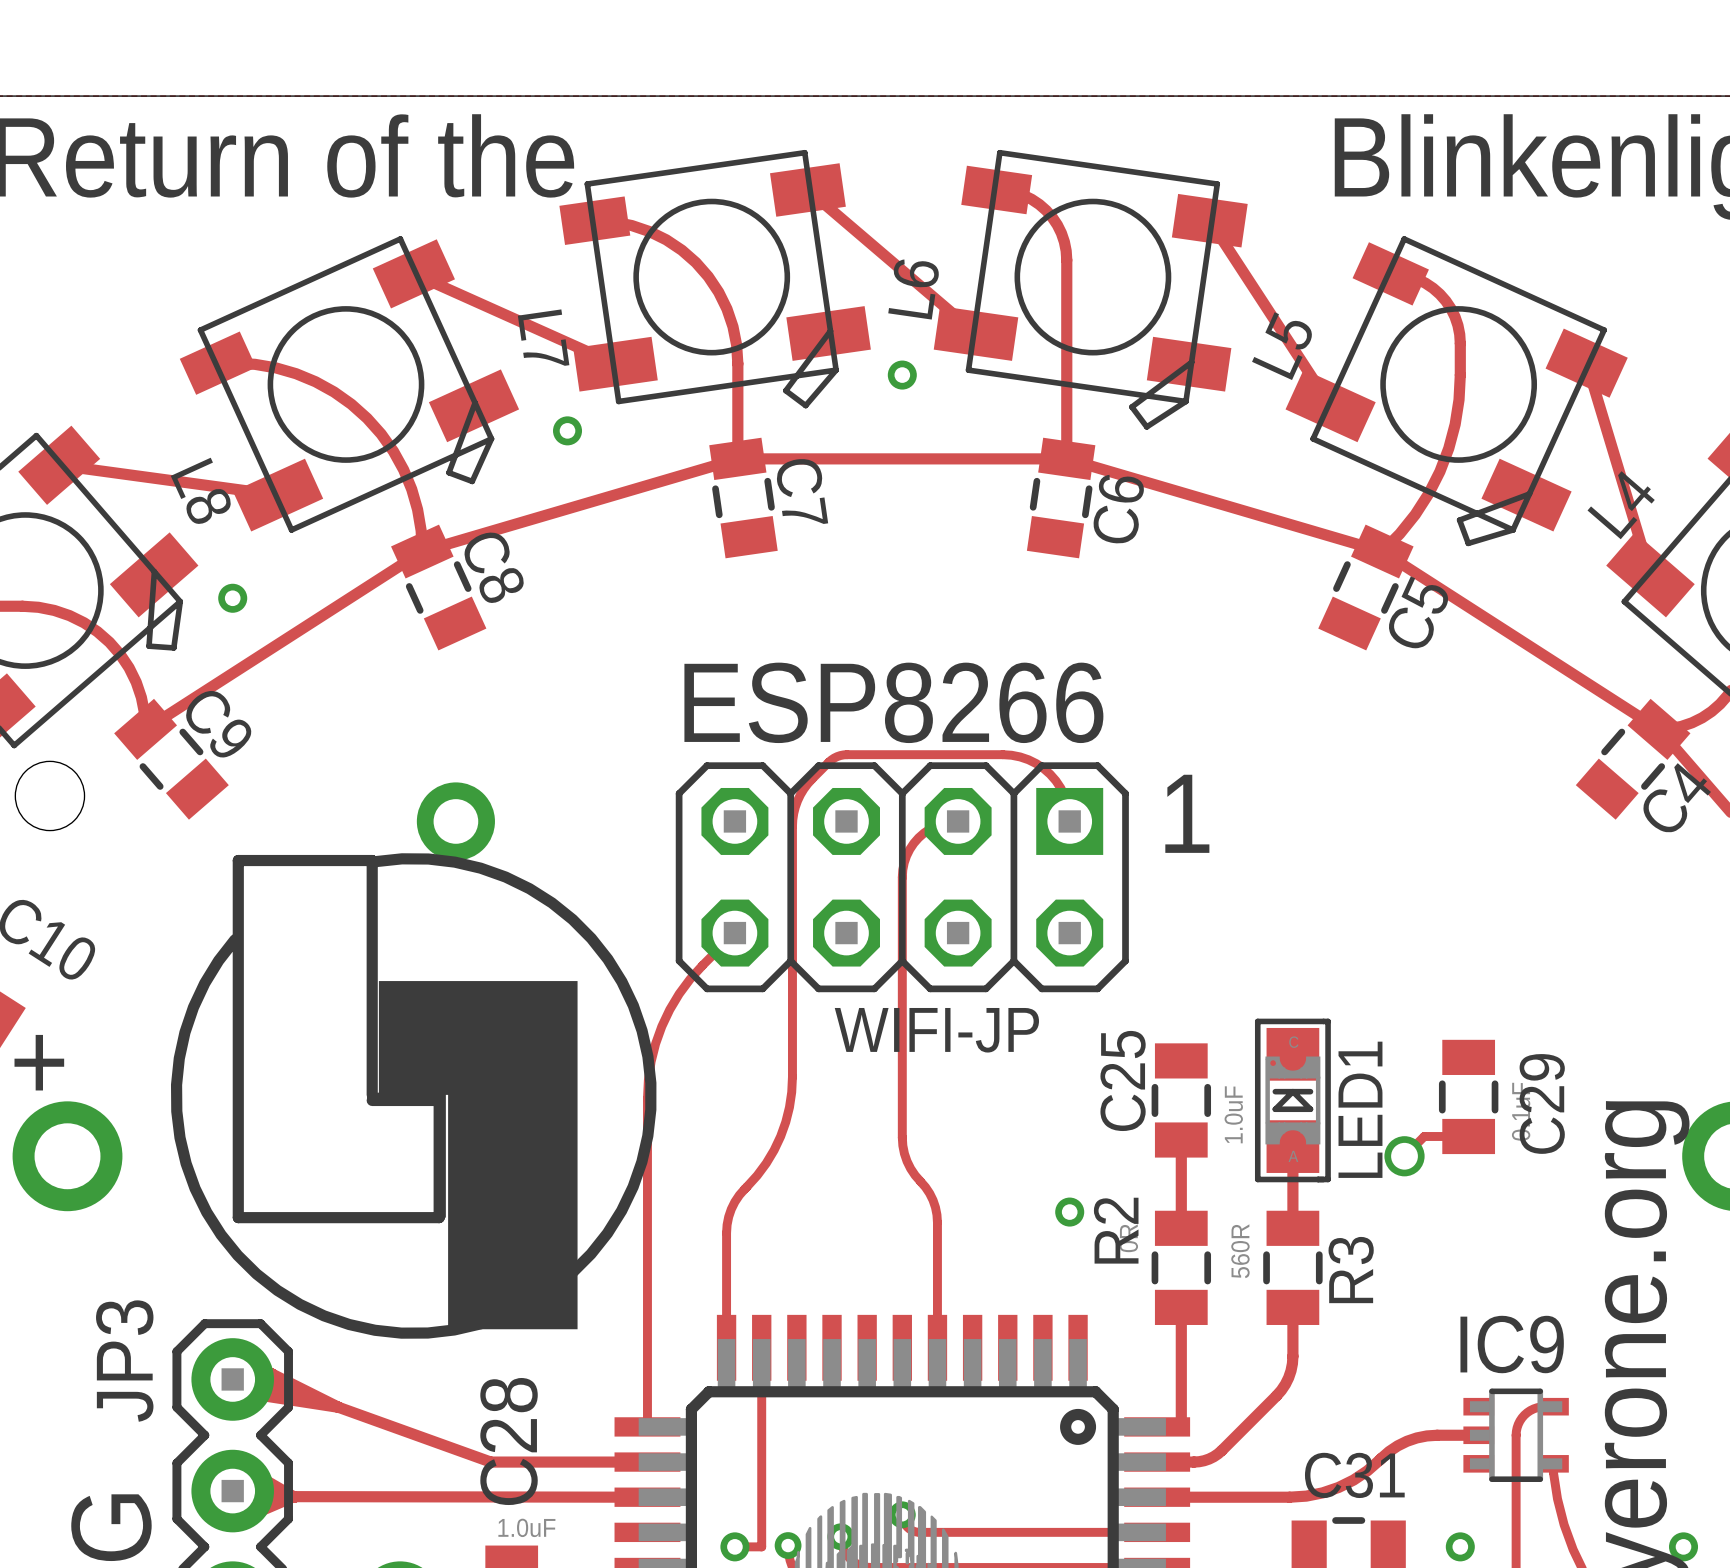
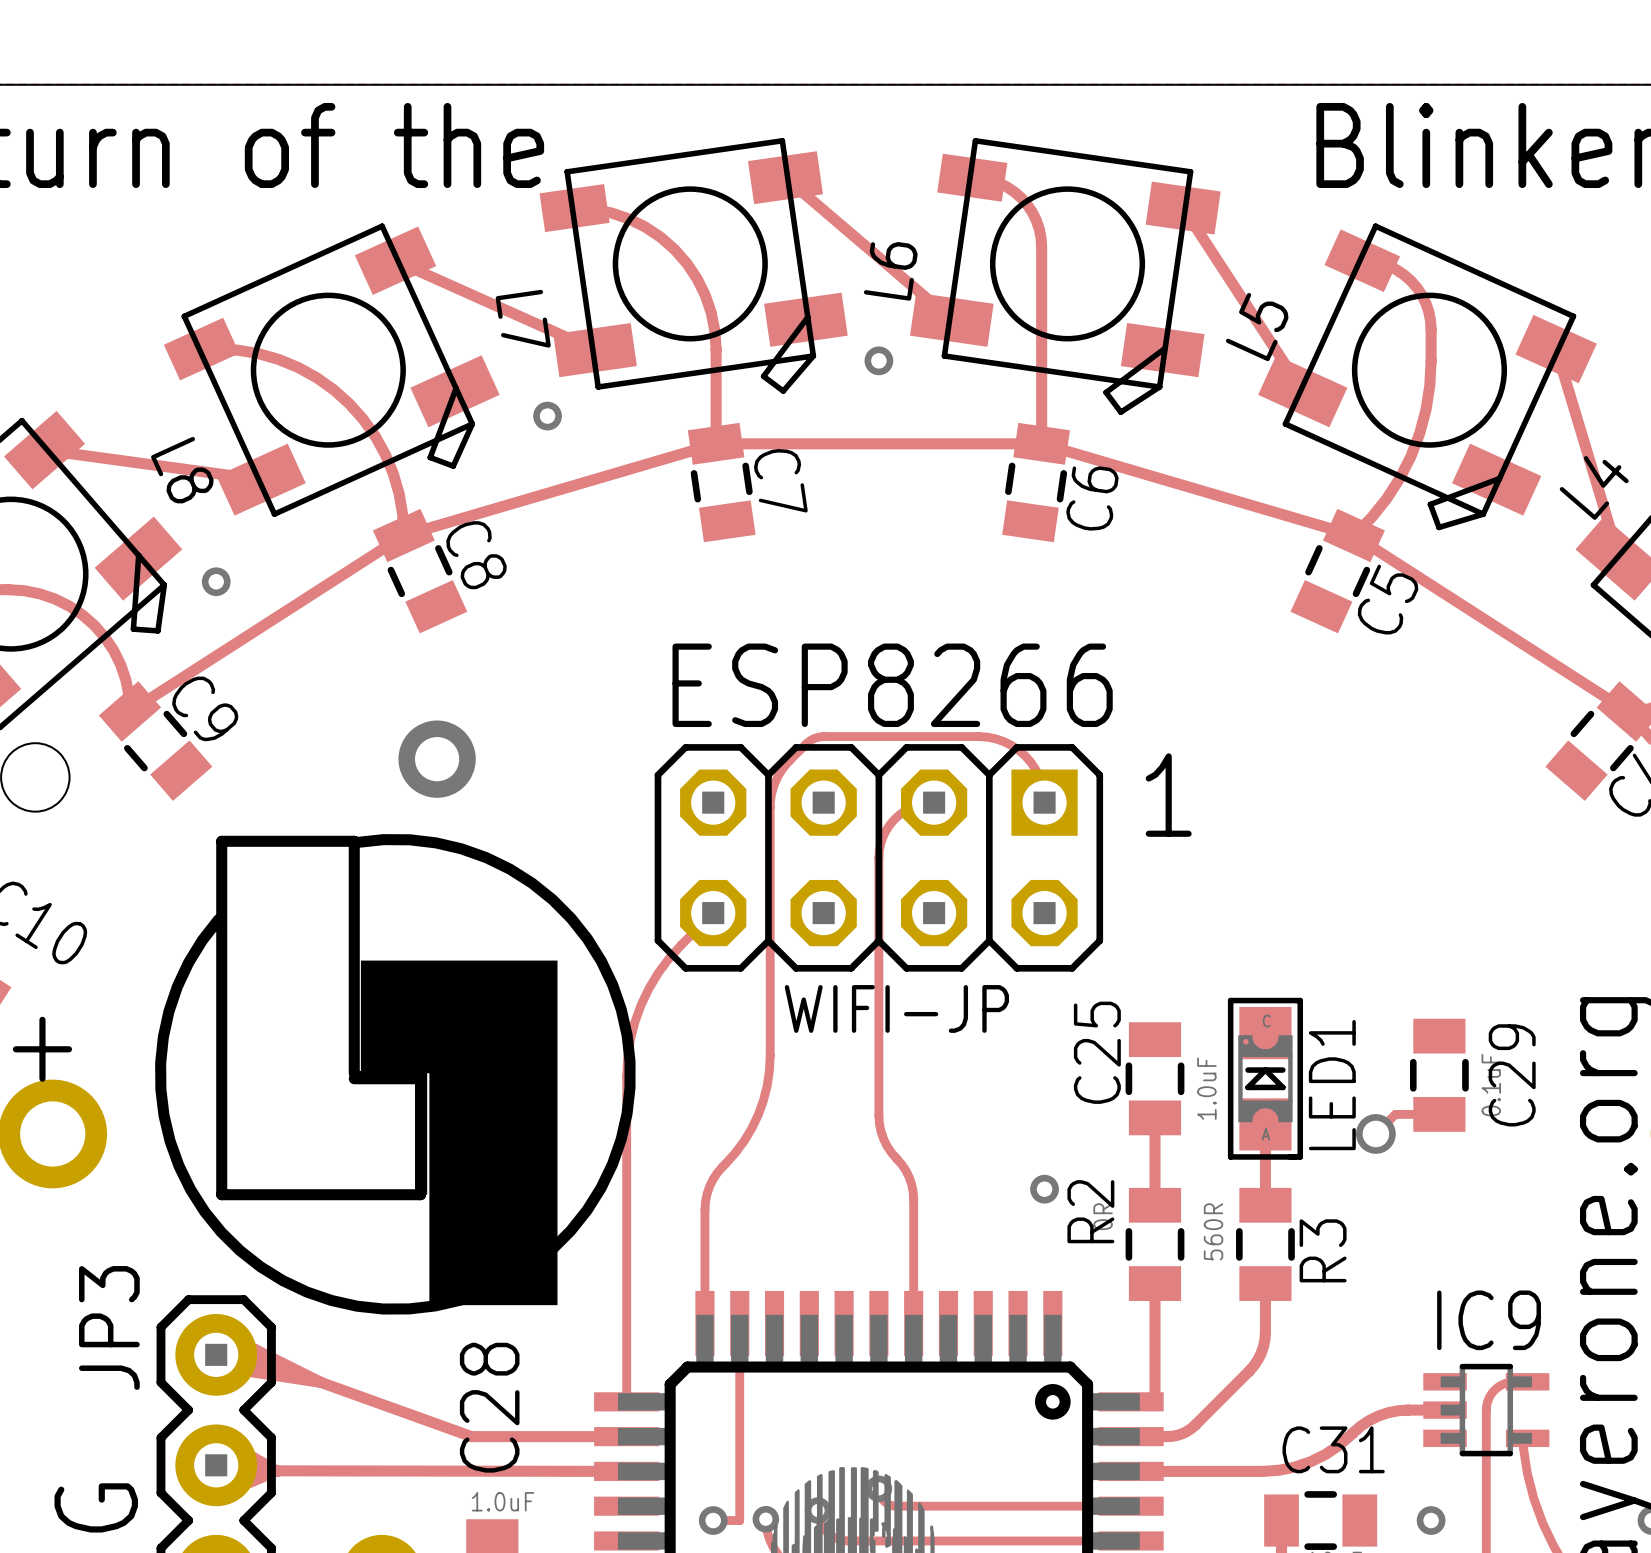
via position: (455, 821) -> (437, 759)
IC9 footprint: [1463, 1388, 1569, 1482] -> [1423, 1363, 1550, 1457]

